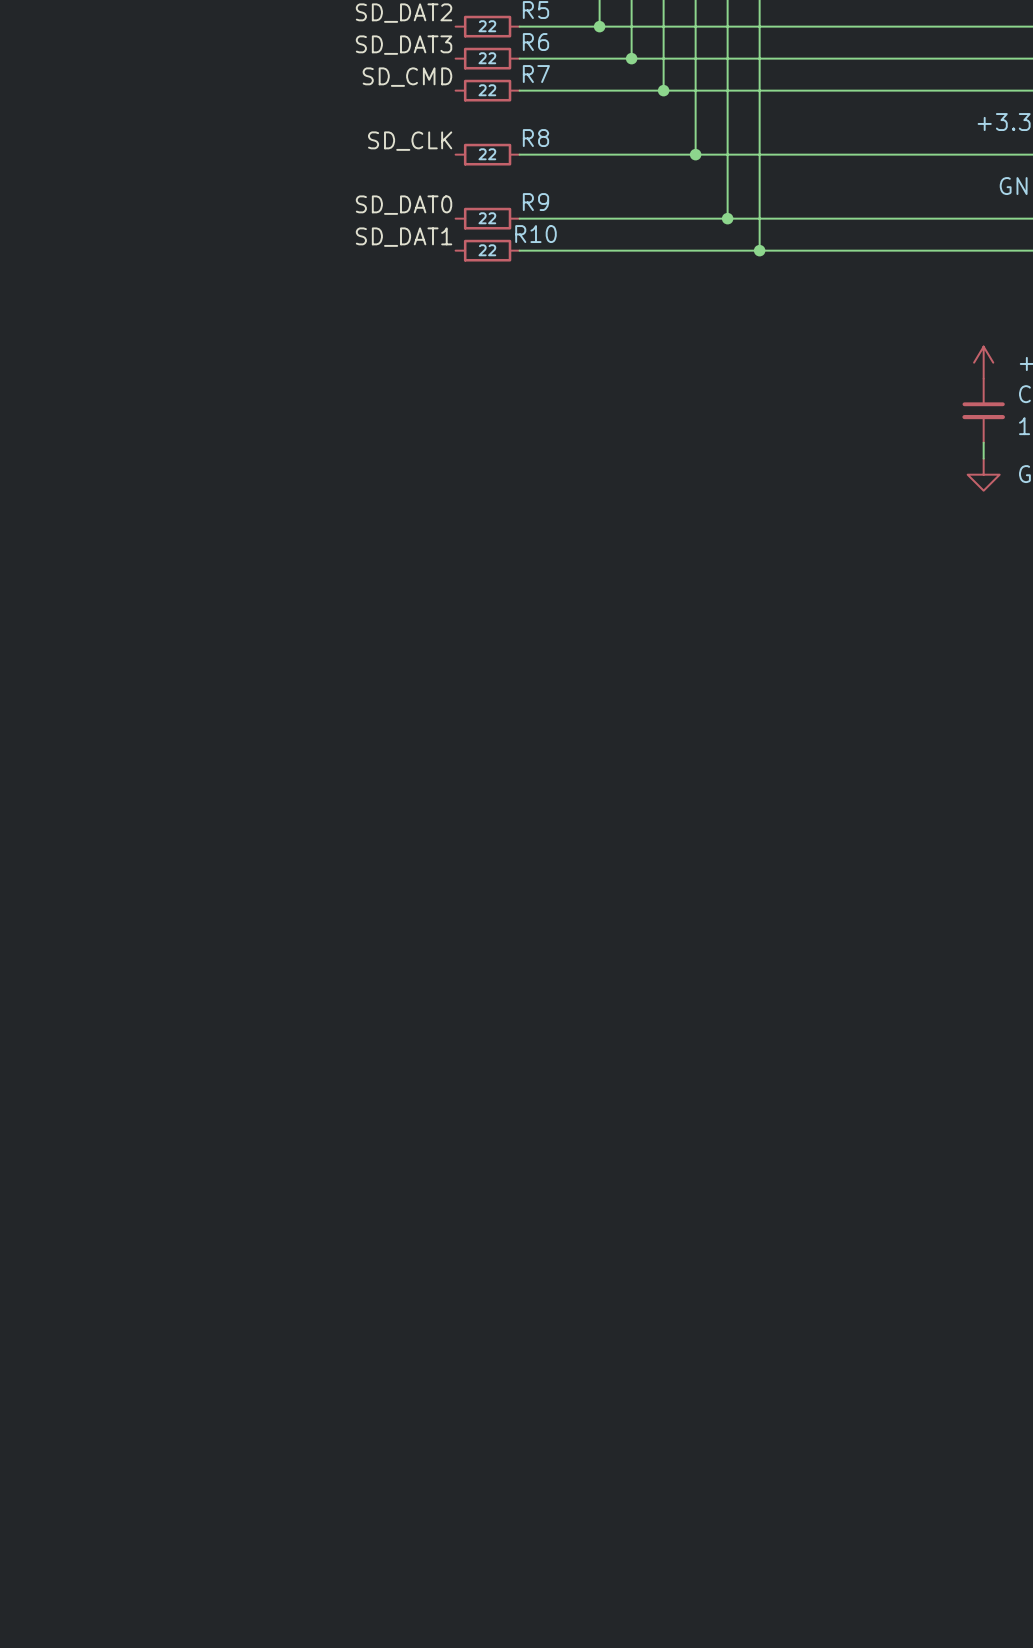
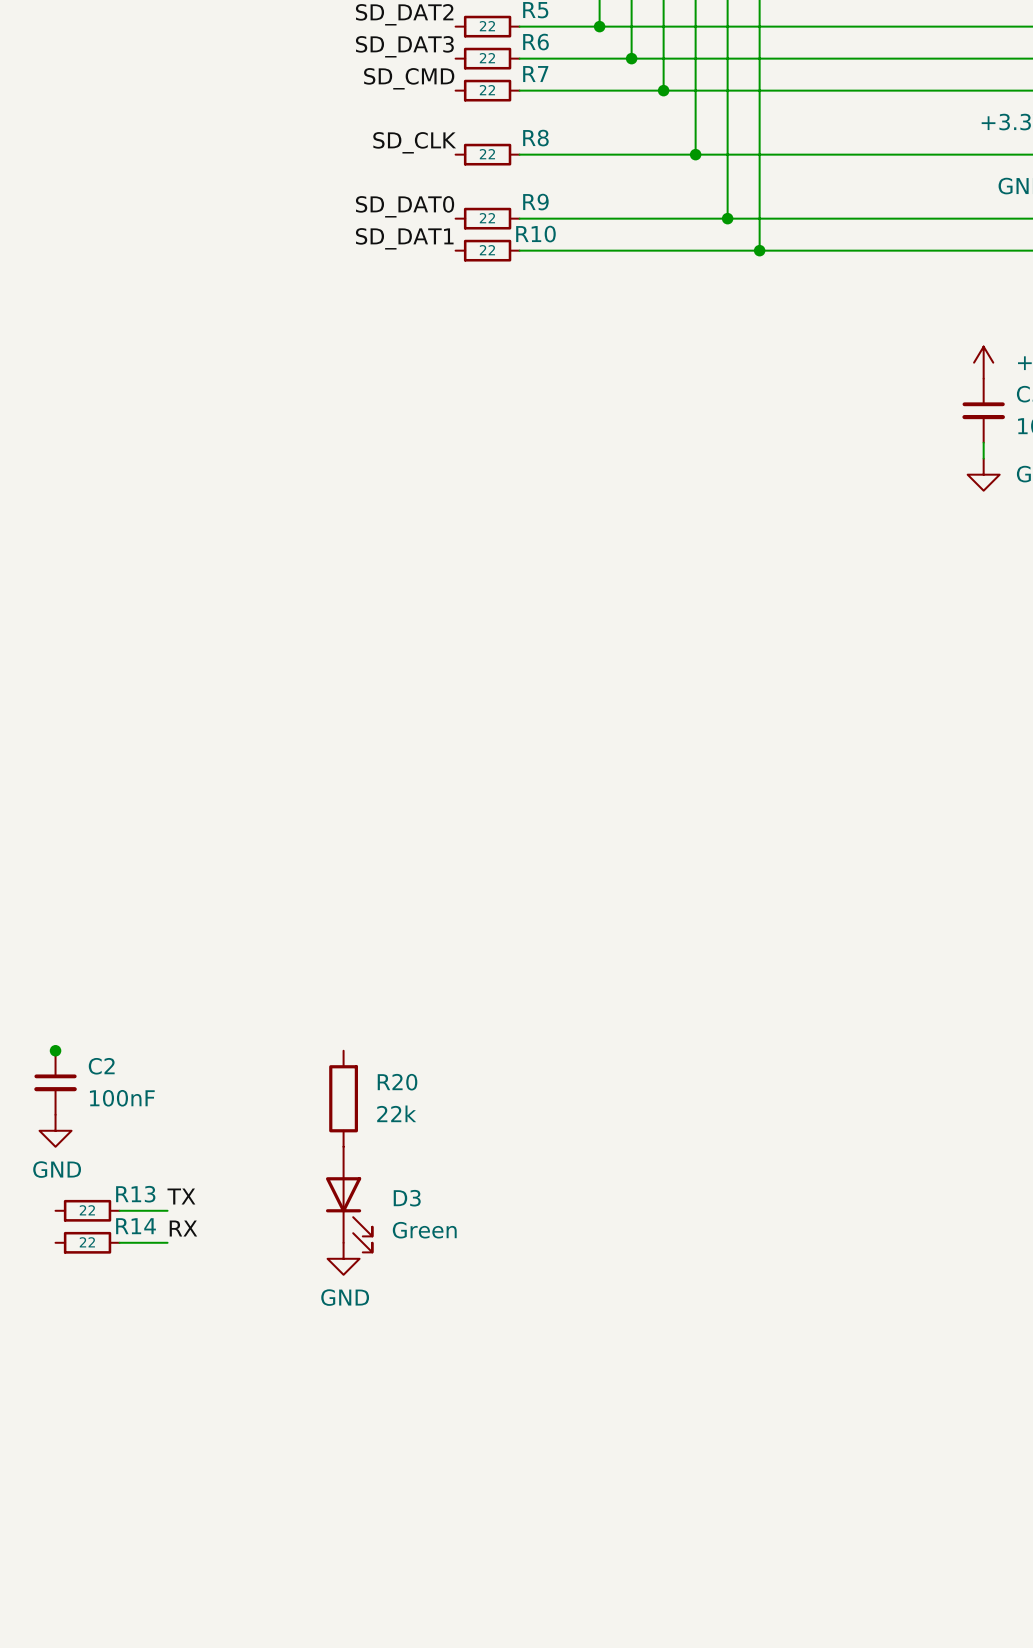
junction: none -> (55, 1050)
C2: none -> 100nF (55, 1082)
R20: none -> 22k (343, 1098)
power symbol: none -> GND (55, 1130)
label: none -> TX (181, 1196)
D3: none -> Green (349, 1199)
R13: none -> 22 (87, 1210)
wire: none -> (119, 1210) (167, 1210)
label: none -> RX (183, 1228)
R14: none -> 22 (87, 1242)
wire: none -> (119, 1242) (167, 1242)
power symbol: none -> GND (343, 1258)

